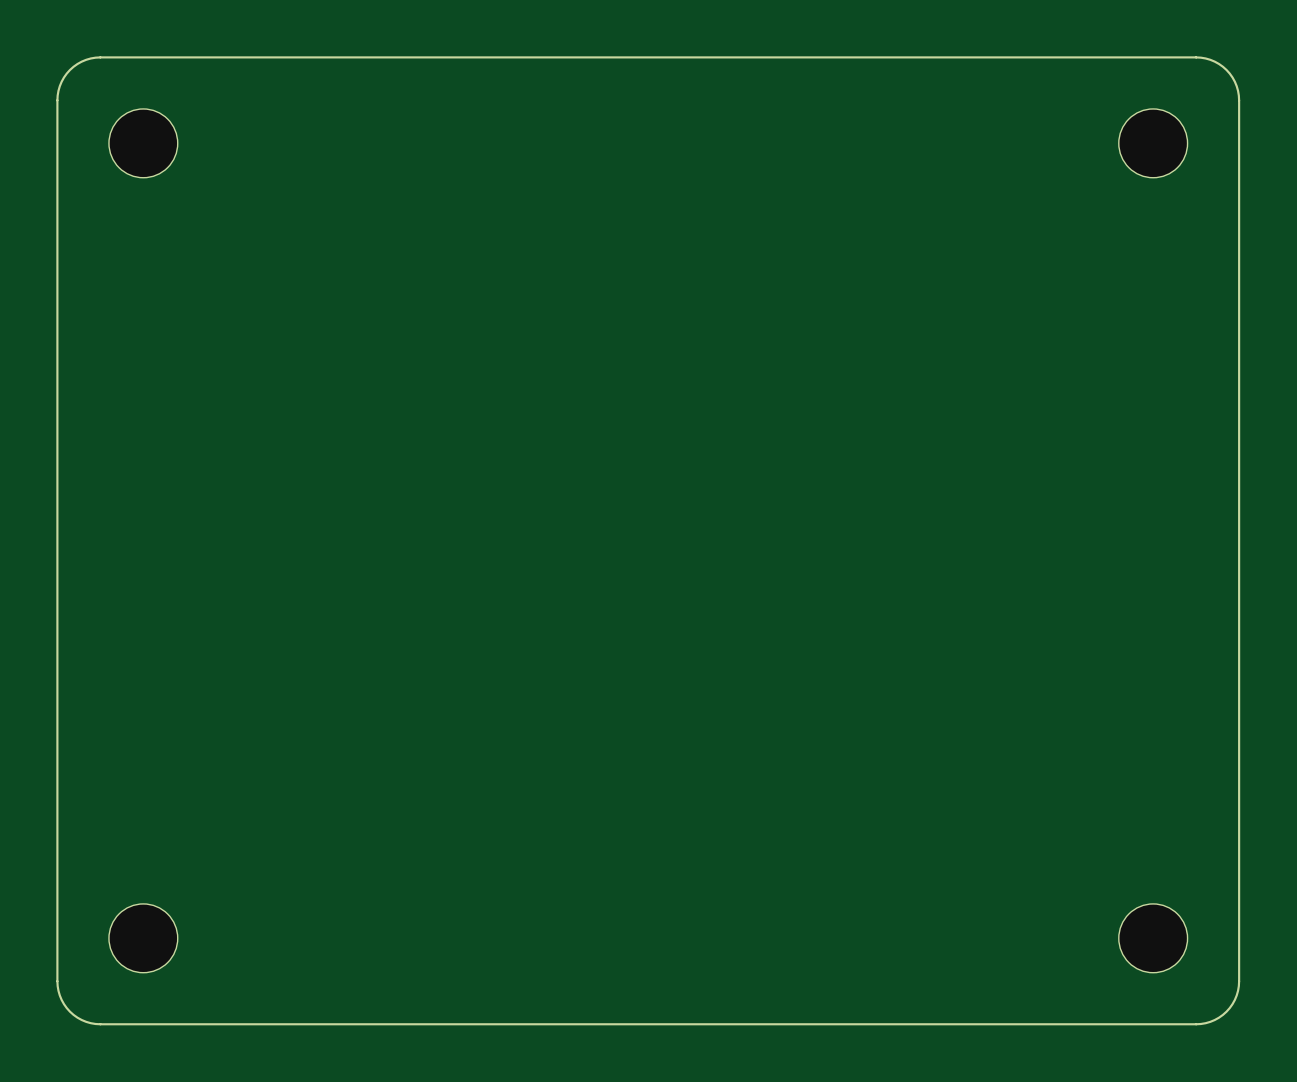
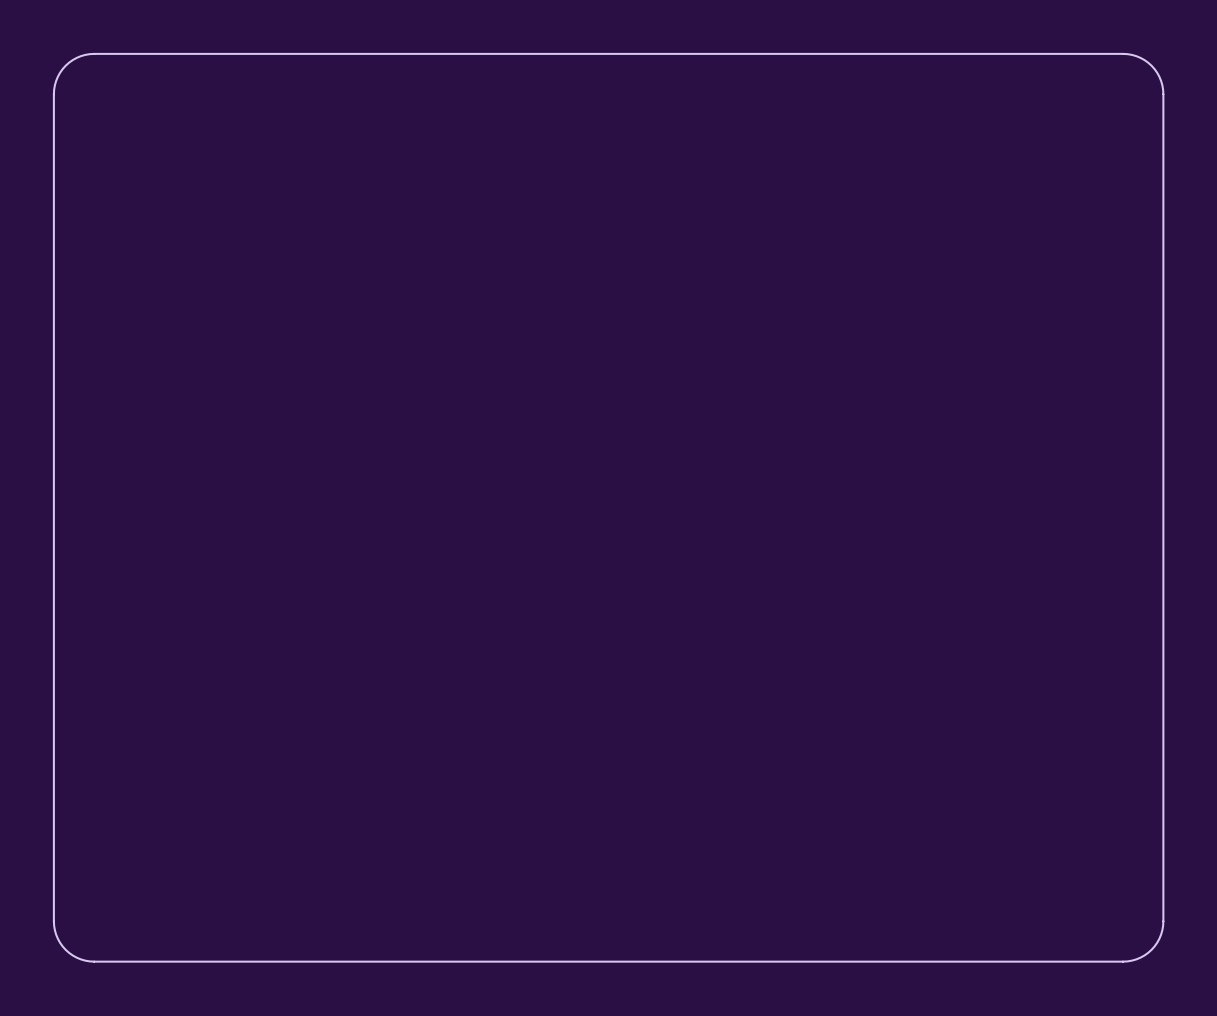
part: (143, 143) -> none
part: (1153, 143) -> none
part: (143, 938) -> none
part: (1153, 938) -> none

